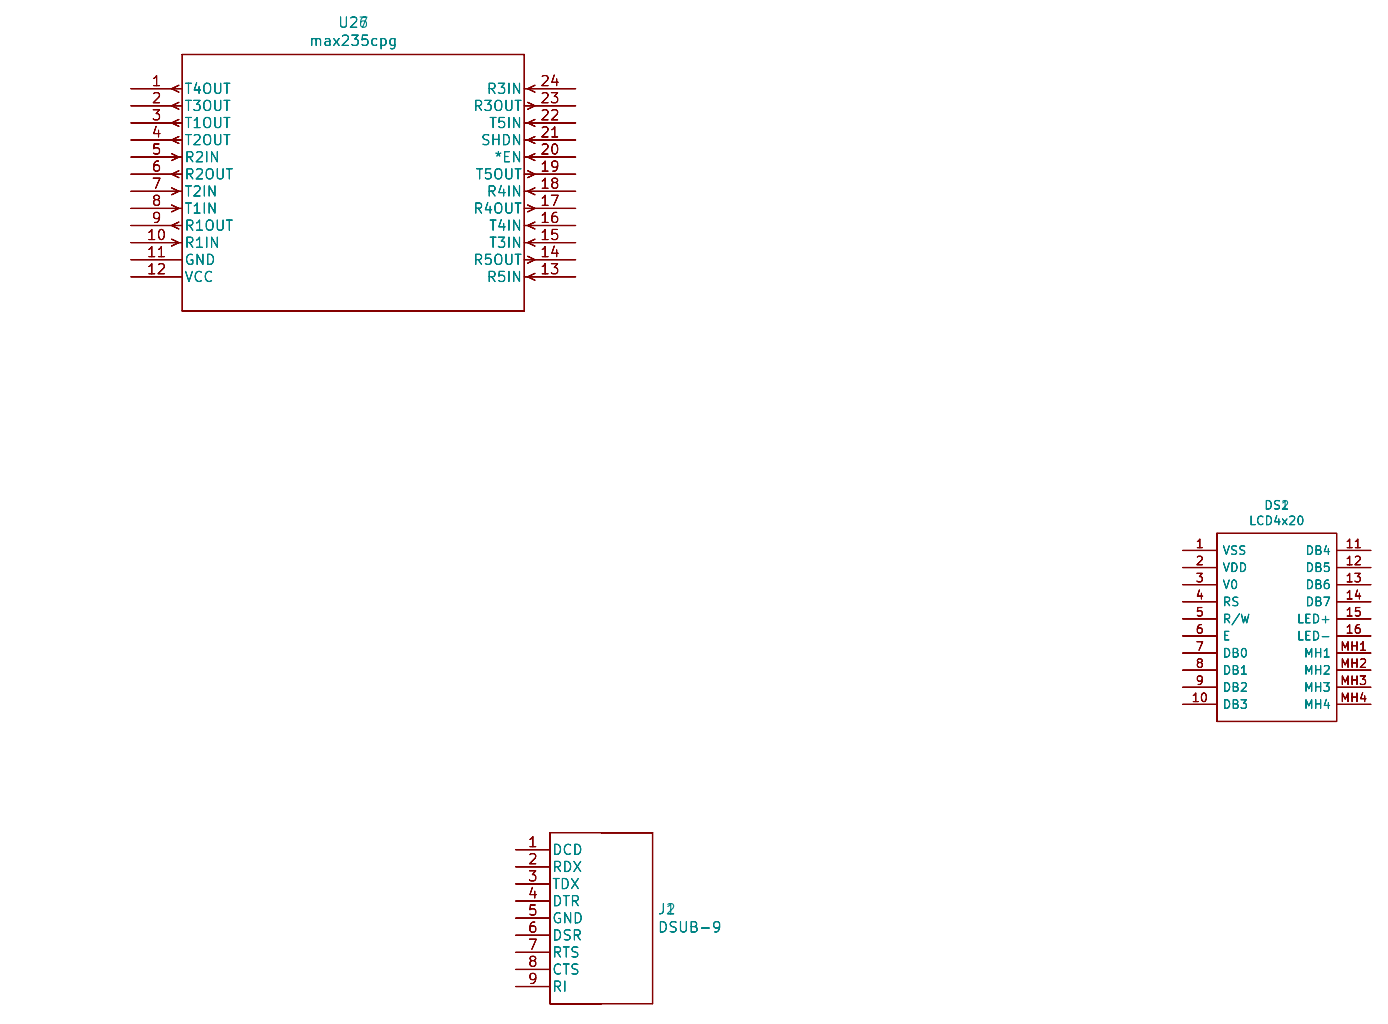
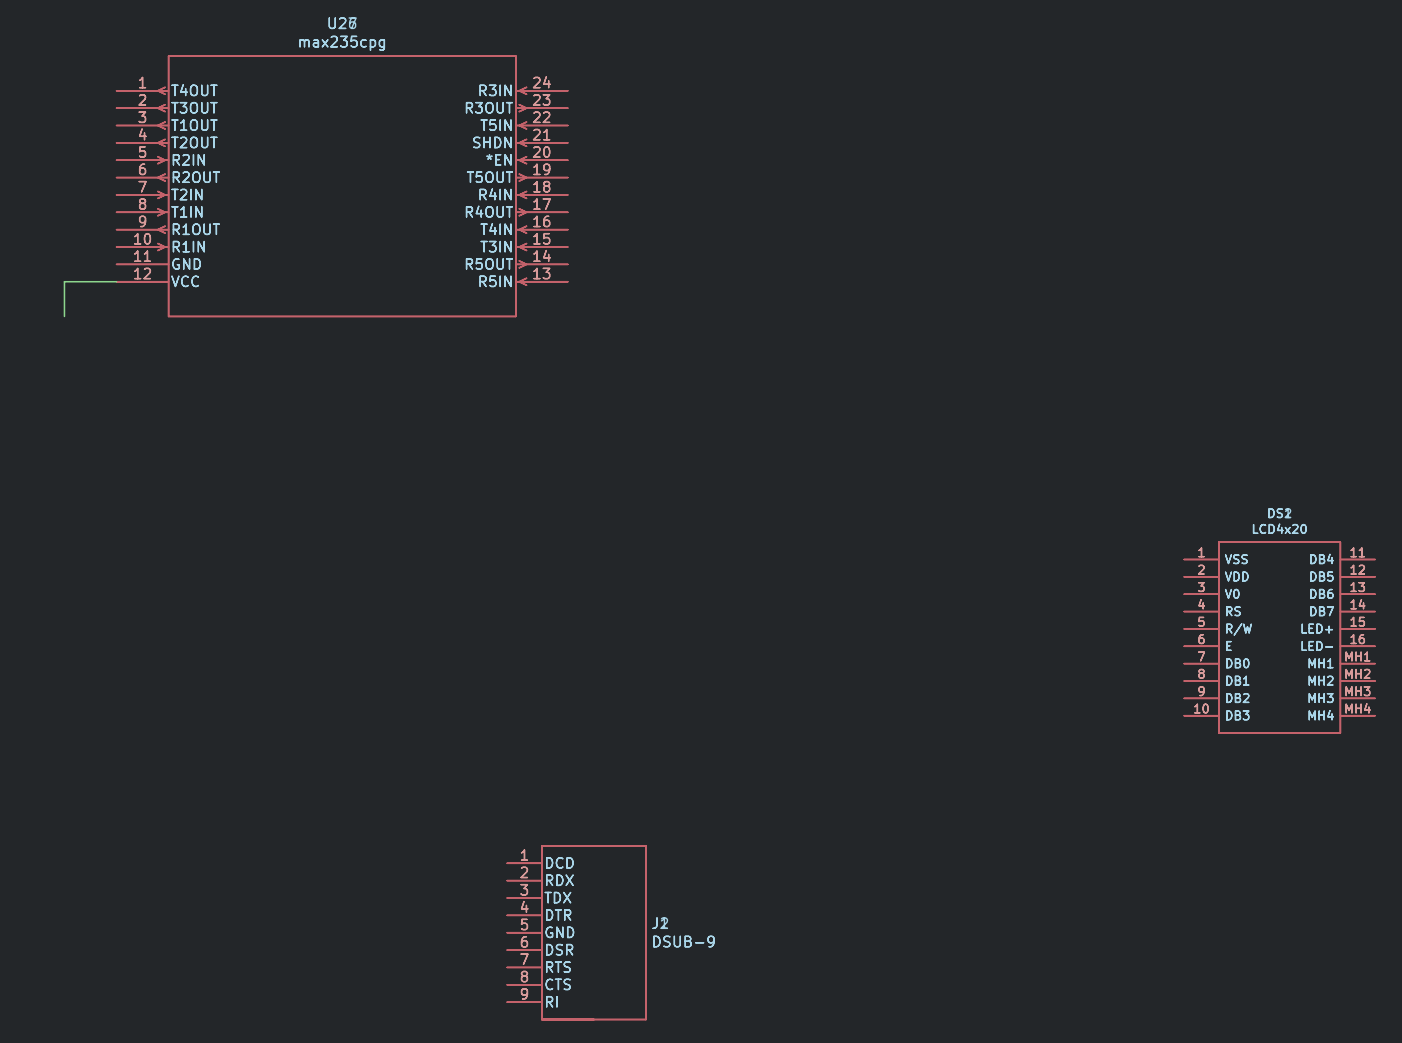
wire: none -> (116, 281) (64, 281) (64, 316)

